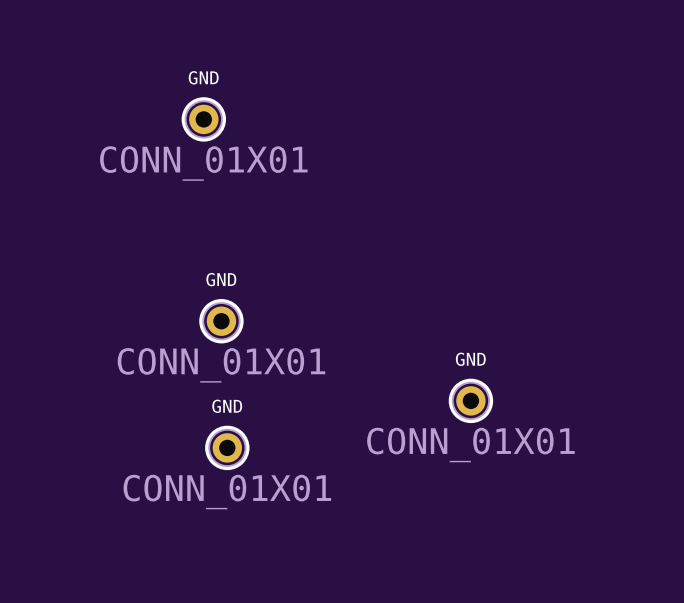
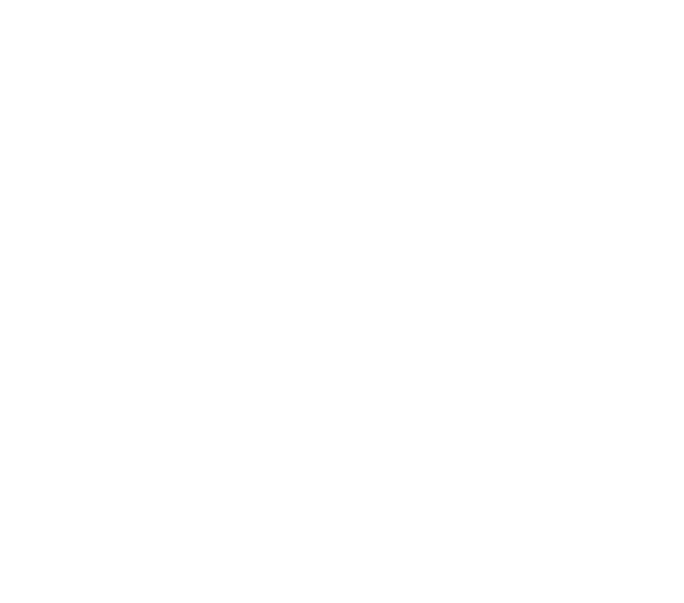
GND: CONN_01X01 (203, 119) -> none
GND: CONN_01X01 (221, 321) -> none
GND: CONN_01X01 (470, 400) -> none
GND: CONN_01X01 (227, 447) -> none

